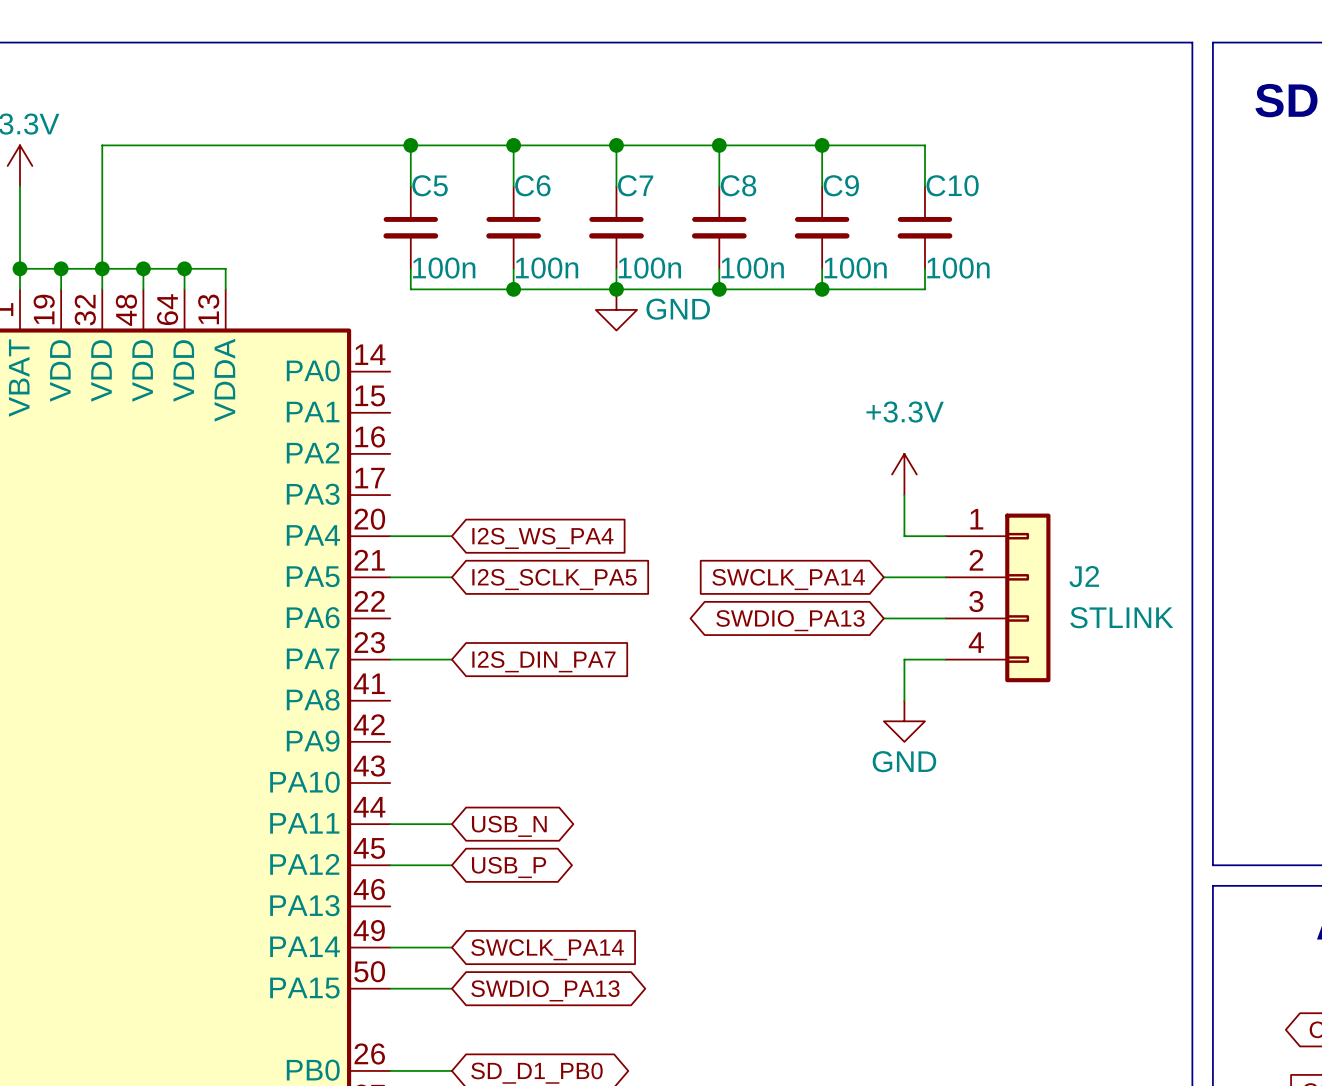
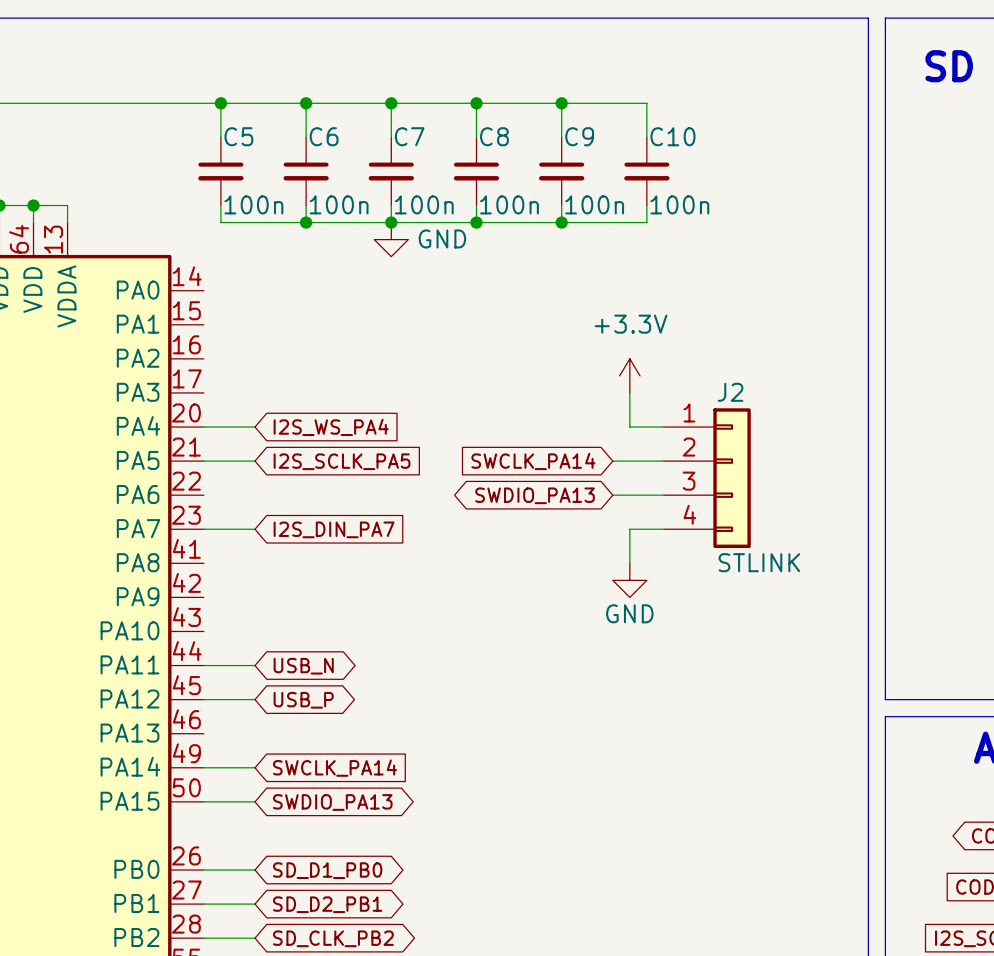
J2 name position: J2 (1084, 576) -> J2 (730, 392)
J2 value position: STLINK (1121, 617) -> STLINK (759, 562)

